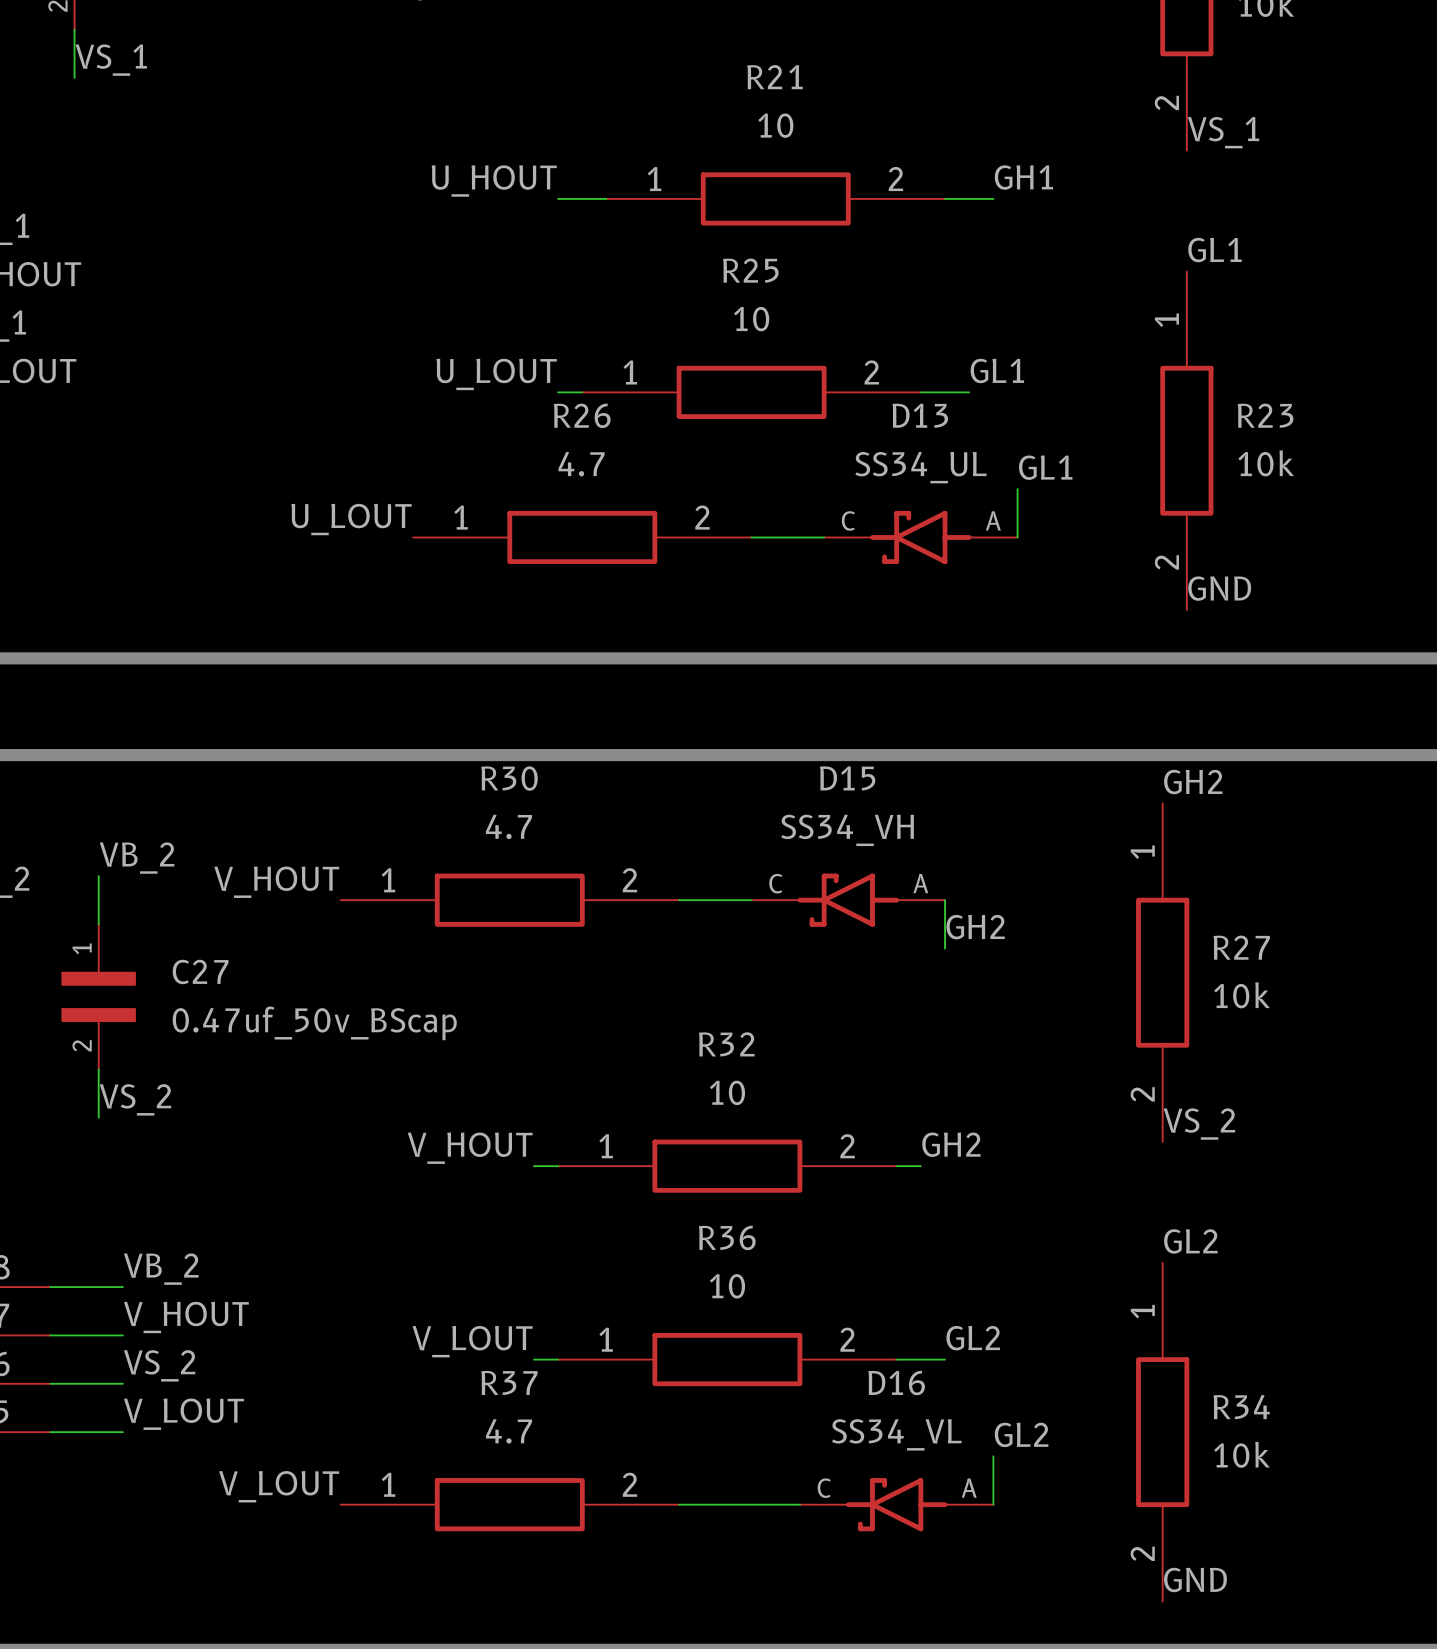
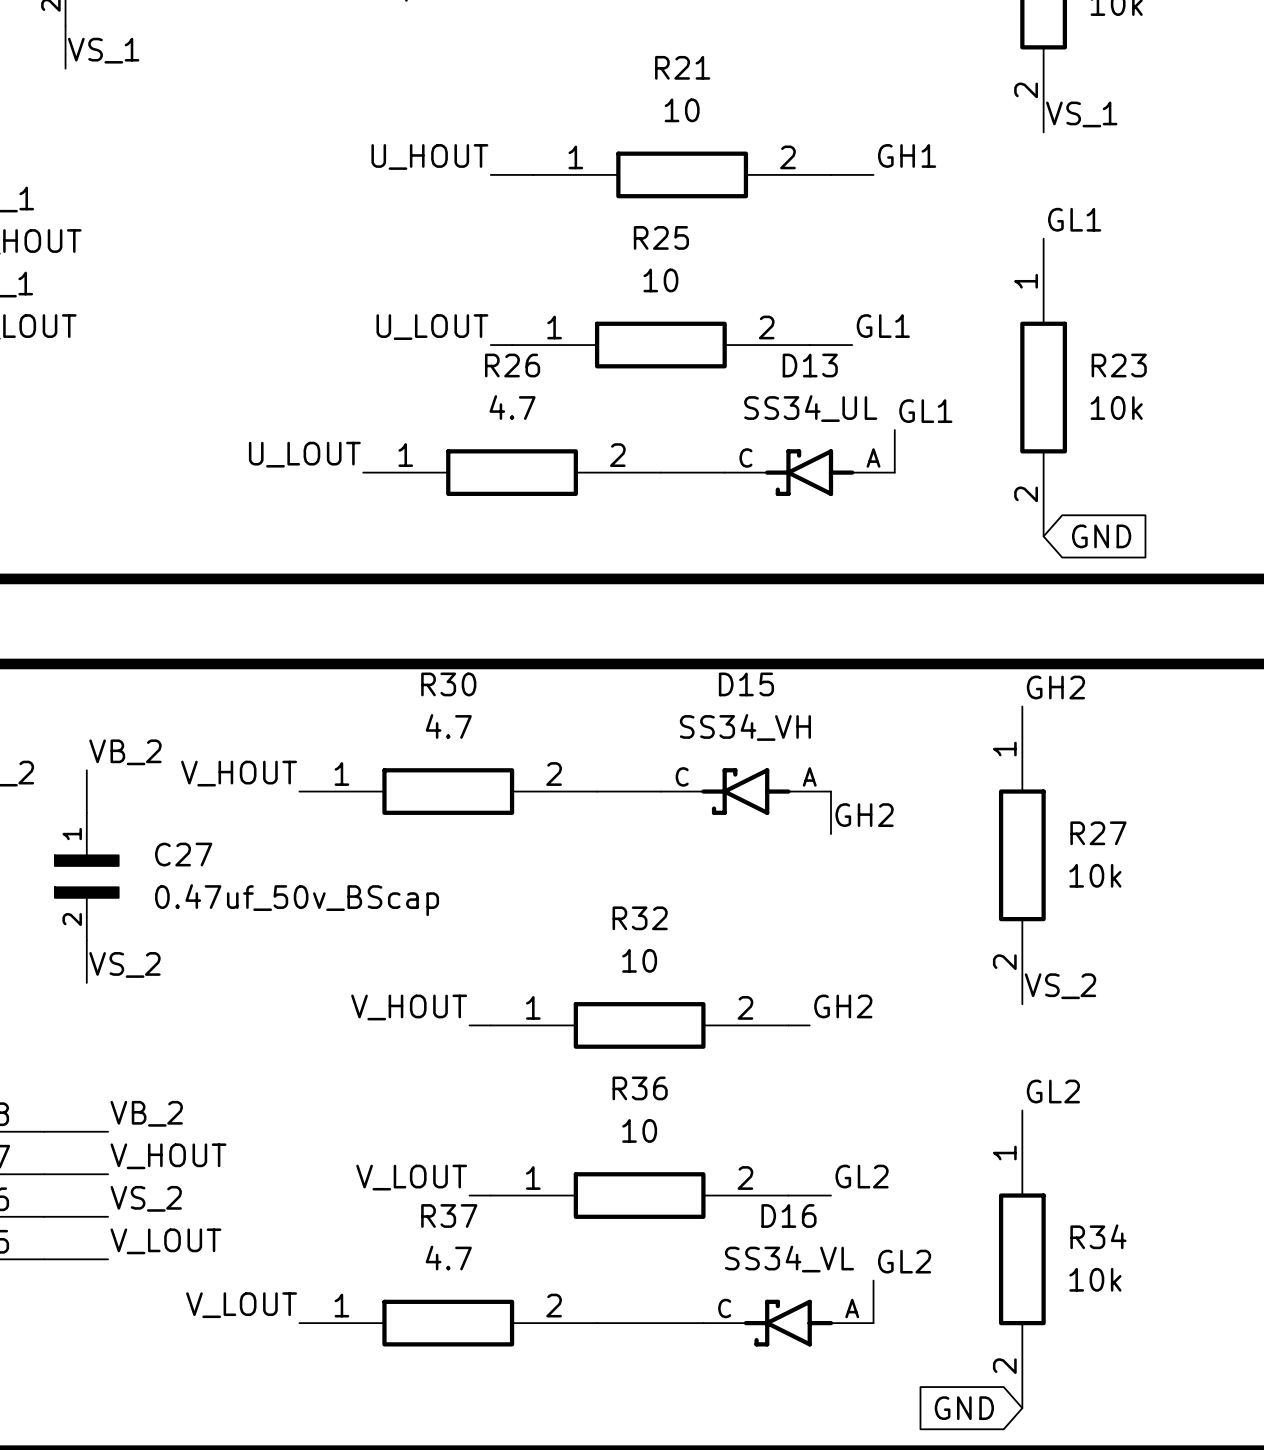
label: GND (1219, 588) -> none
global label: none -> GND (1101, 536)
label: GND (1195, 1579) -> none
global label: none -> GND (964, 1408)

